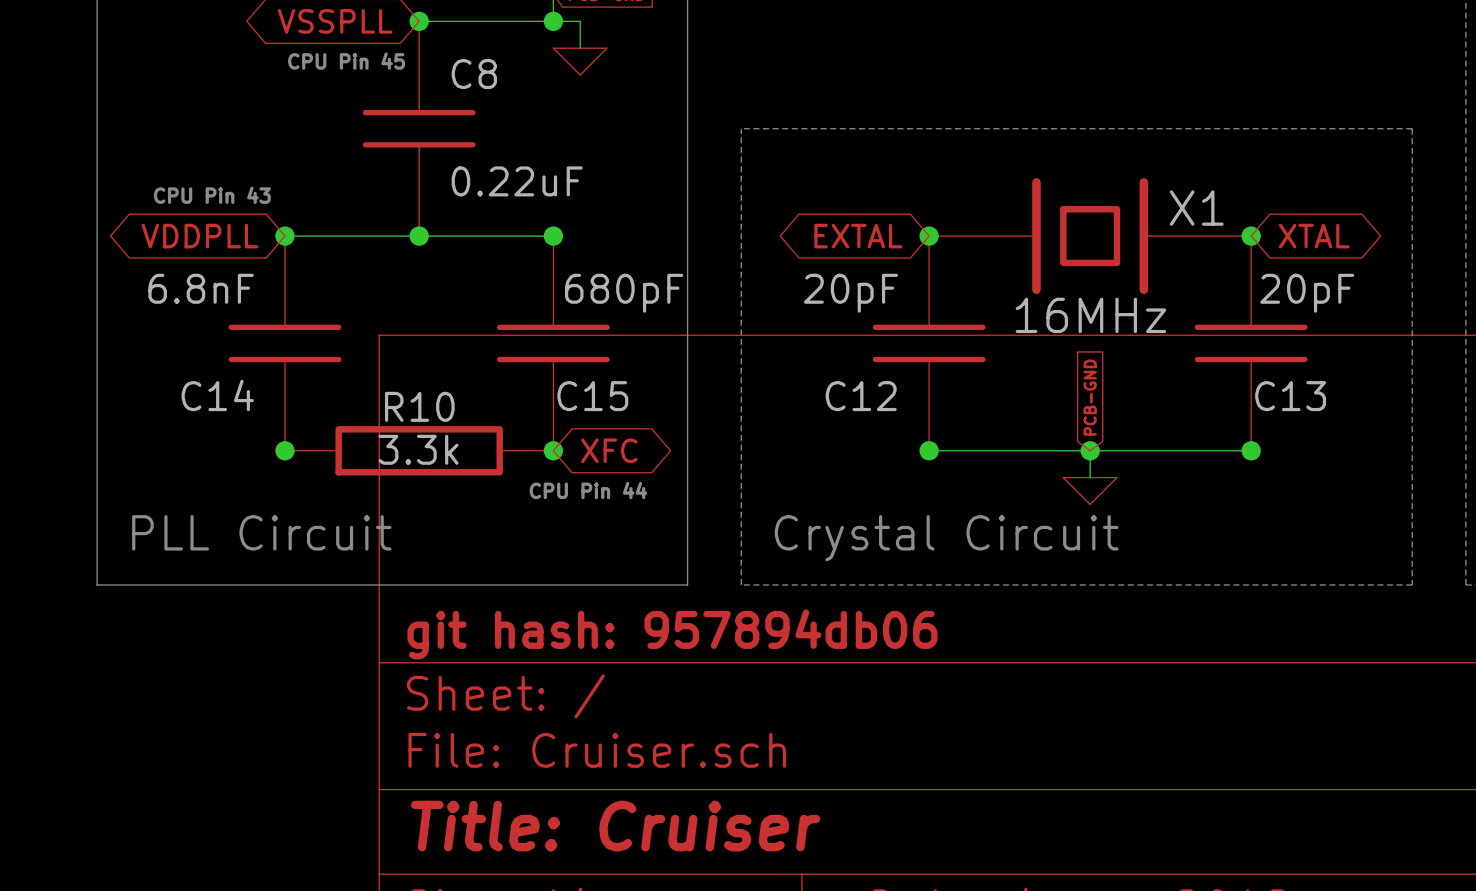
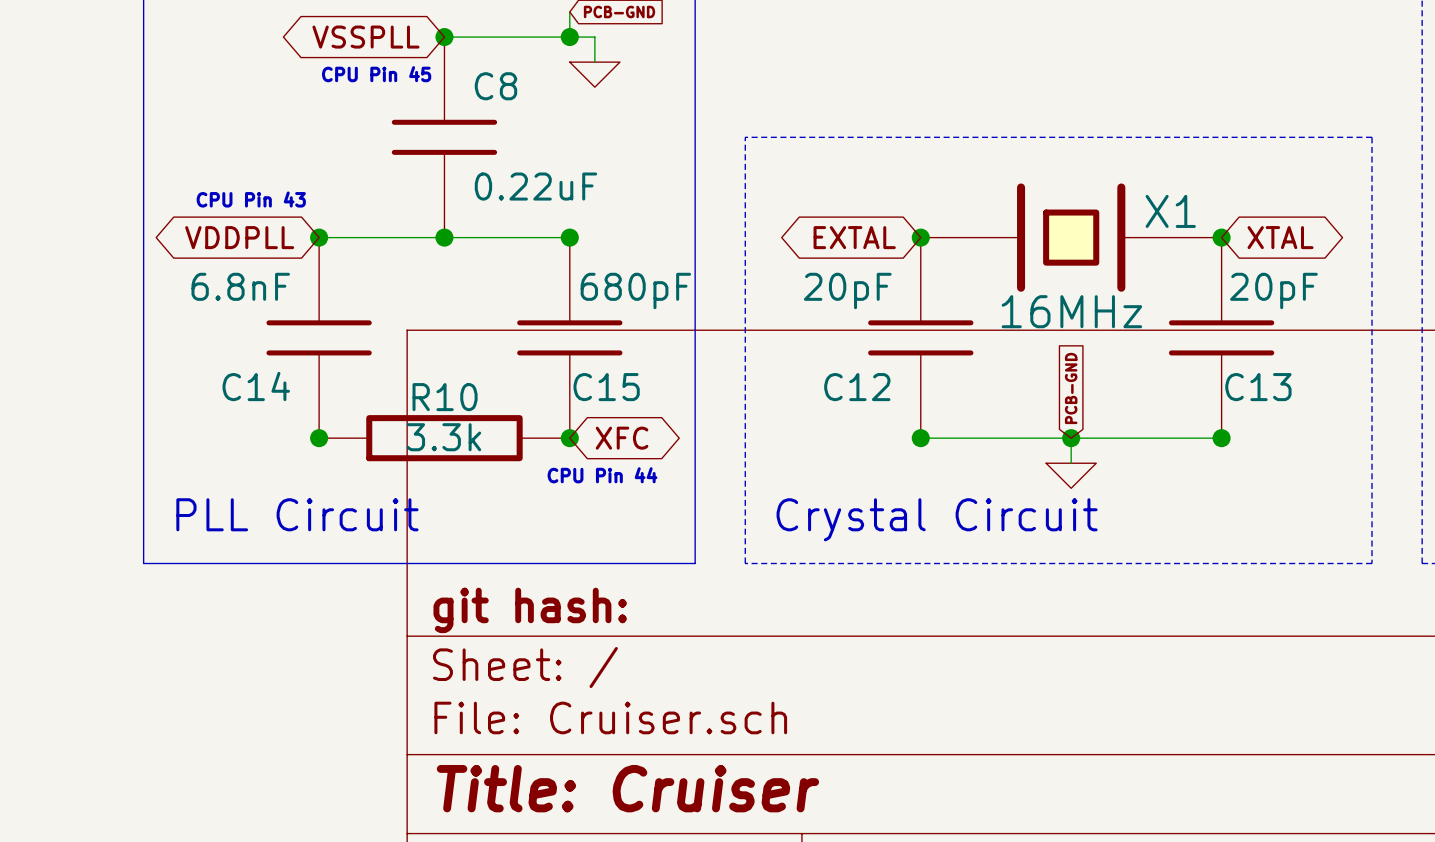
title block: git hash: 957894db06 (672, 634) -> git hash: (530, 610)

